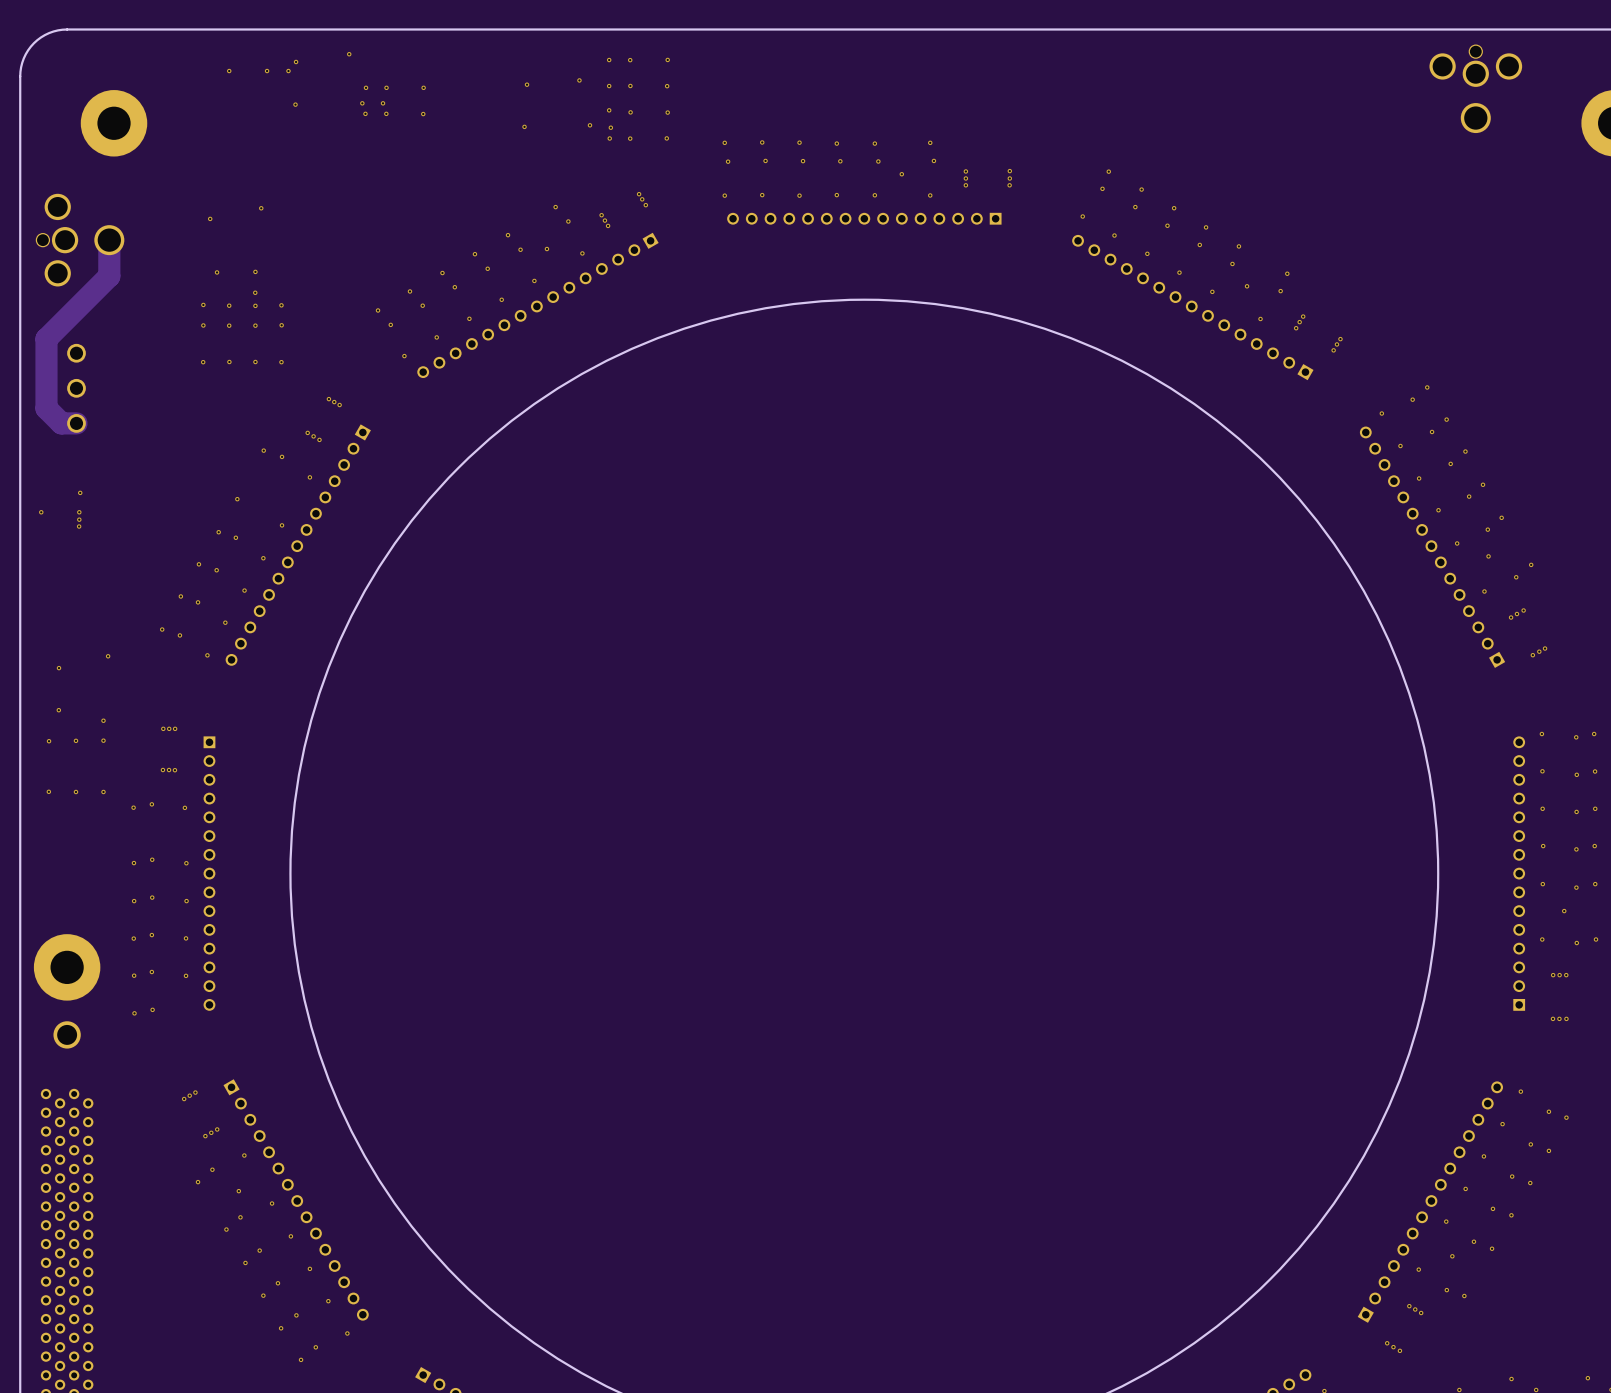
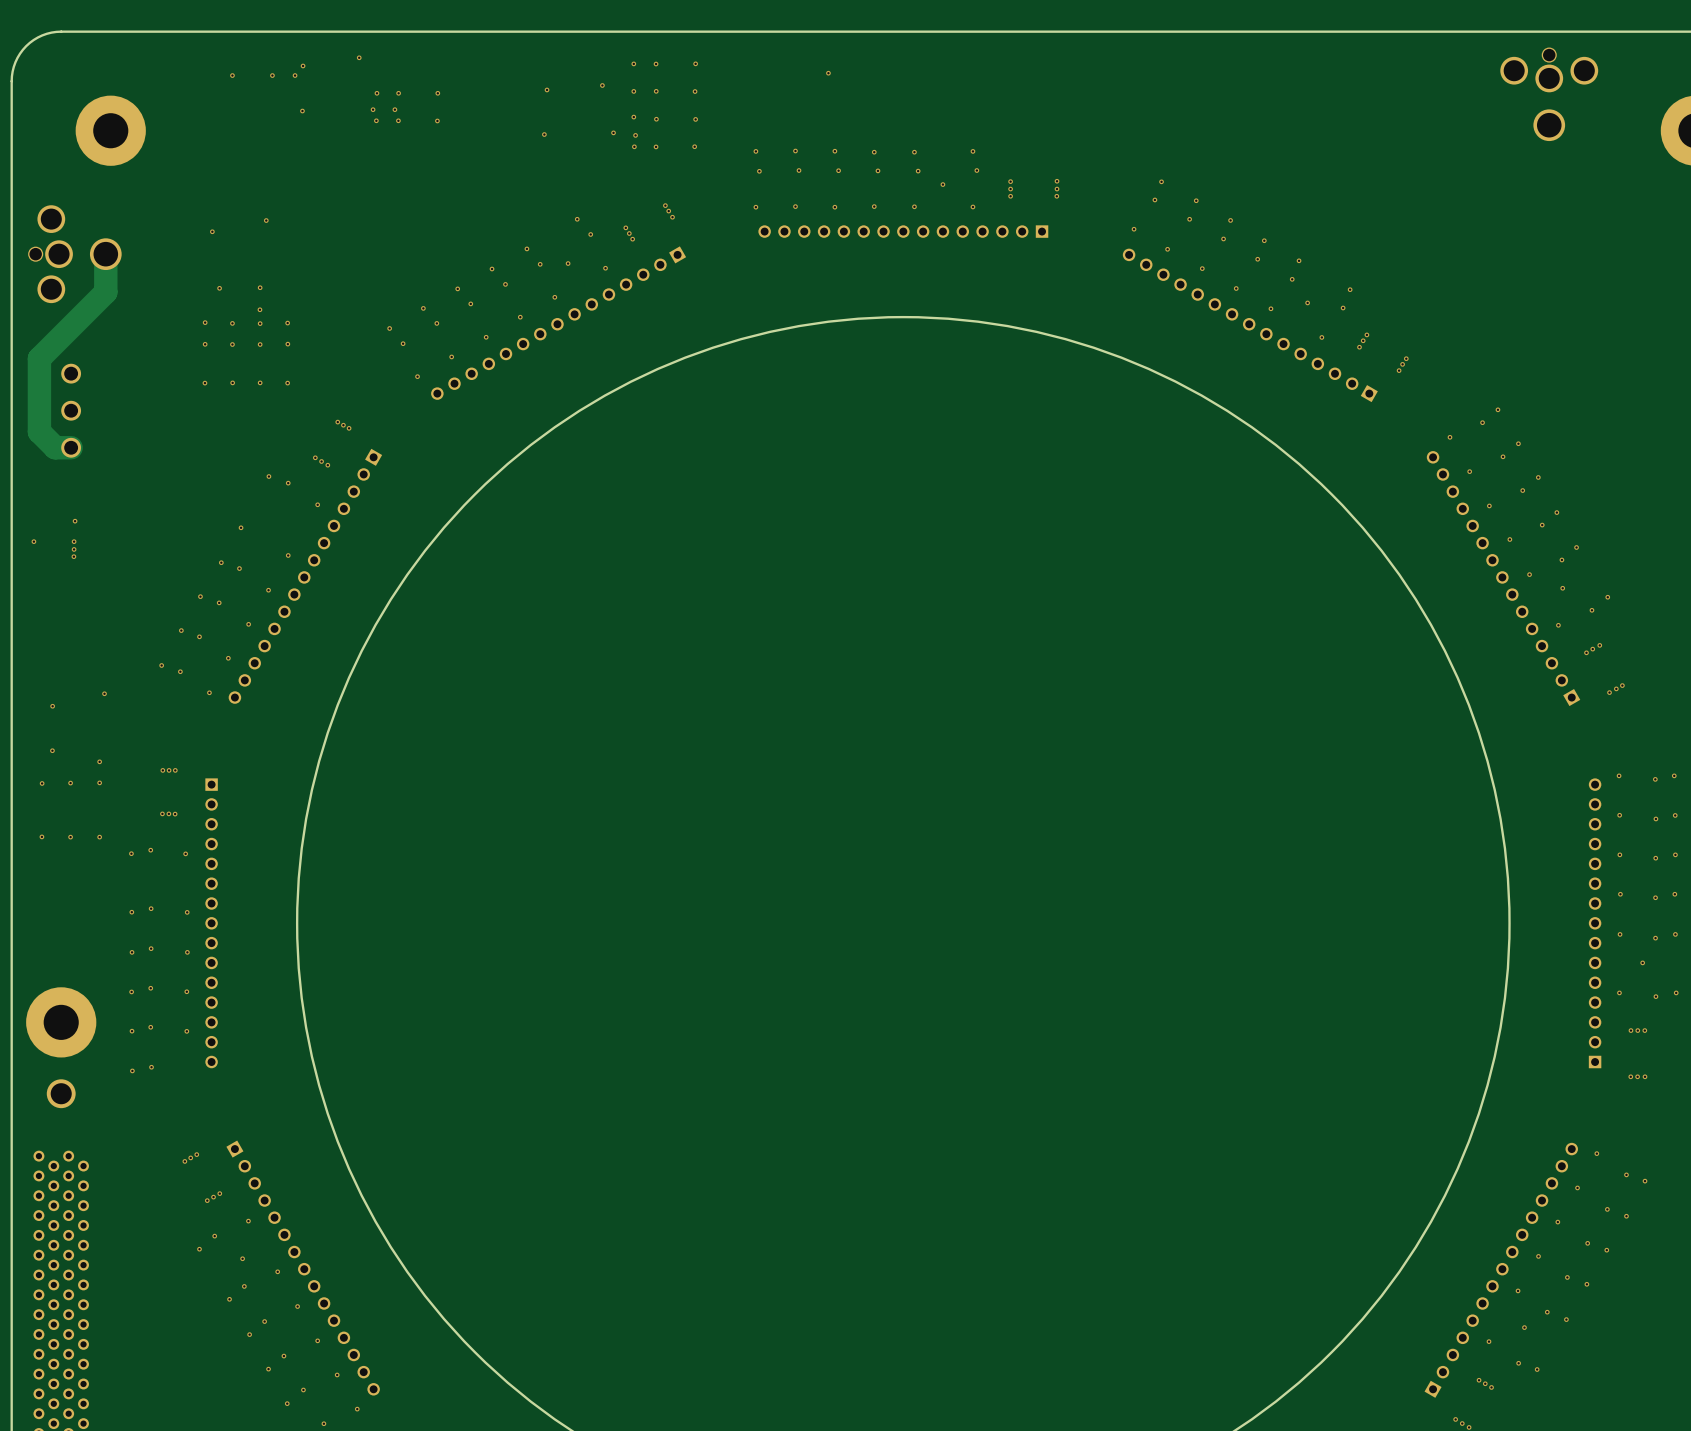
via: none -> (828, 73)

